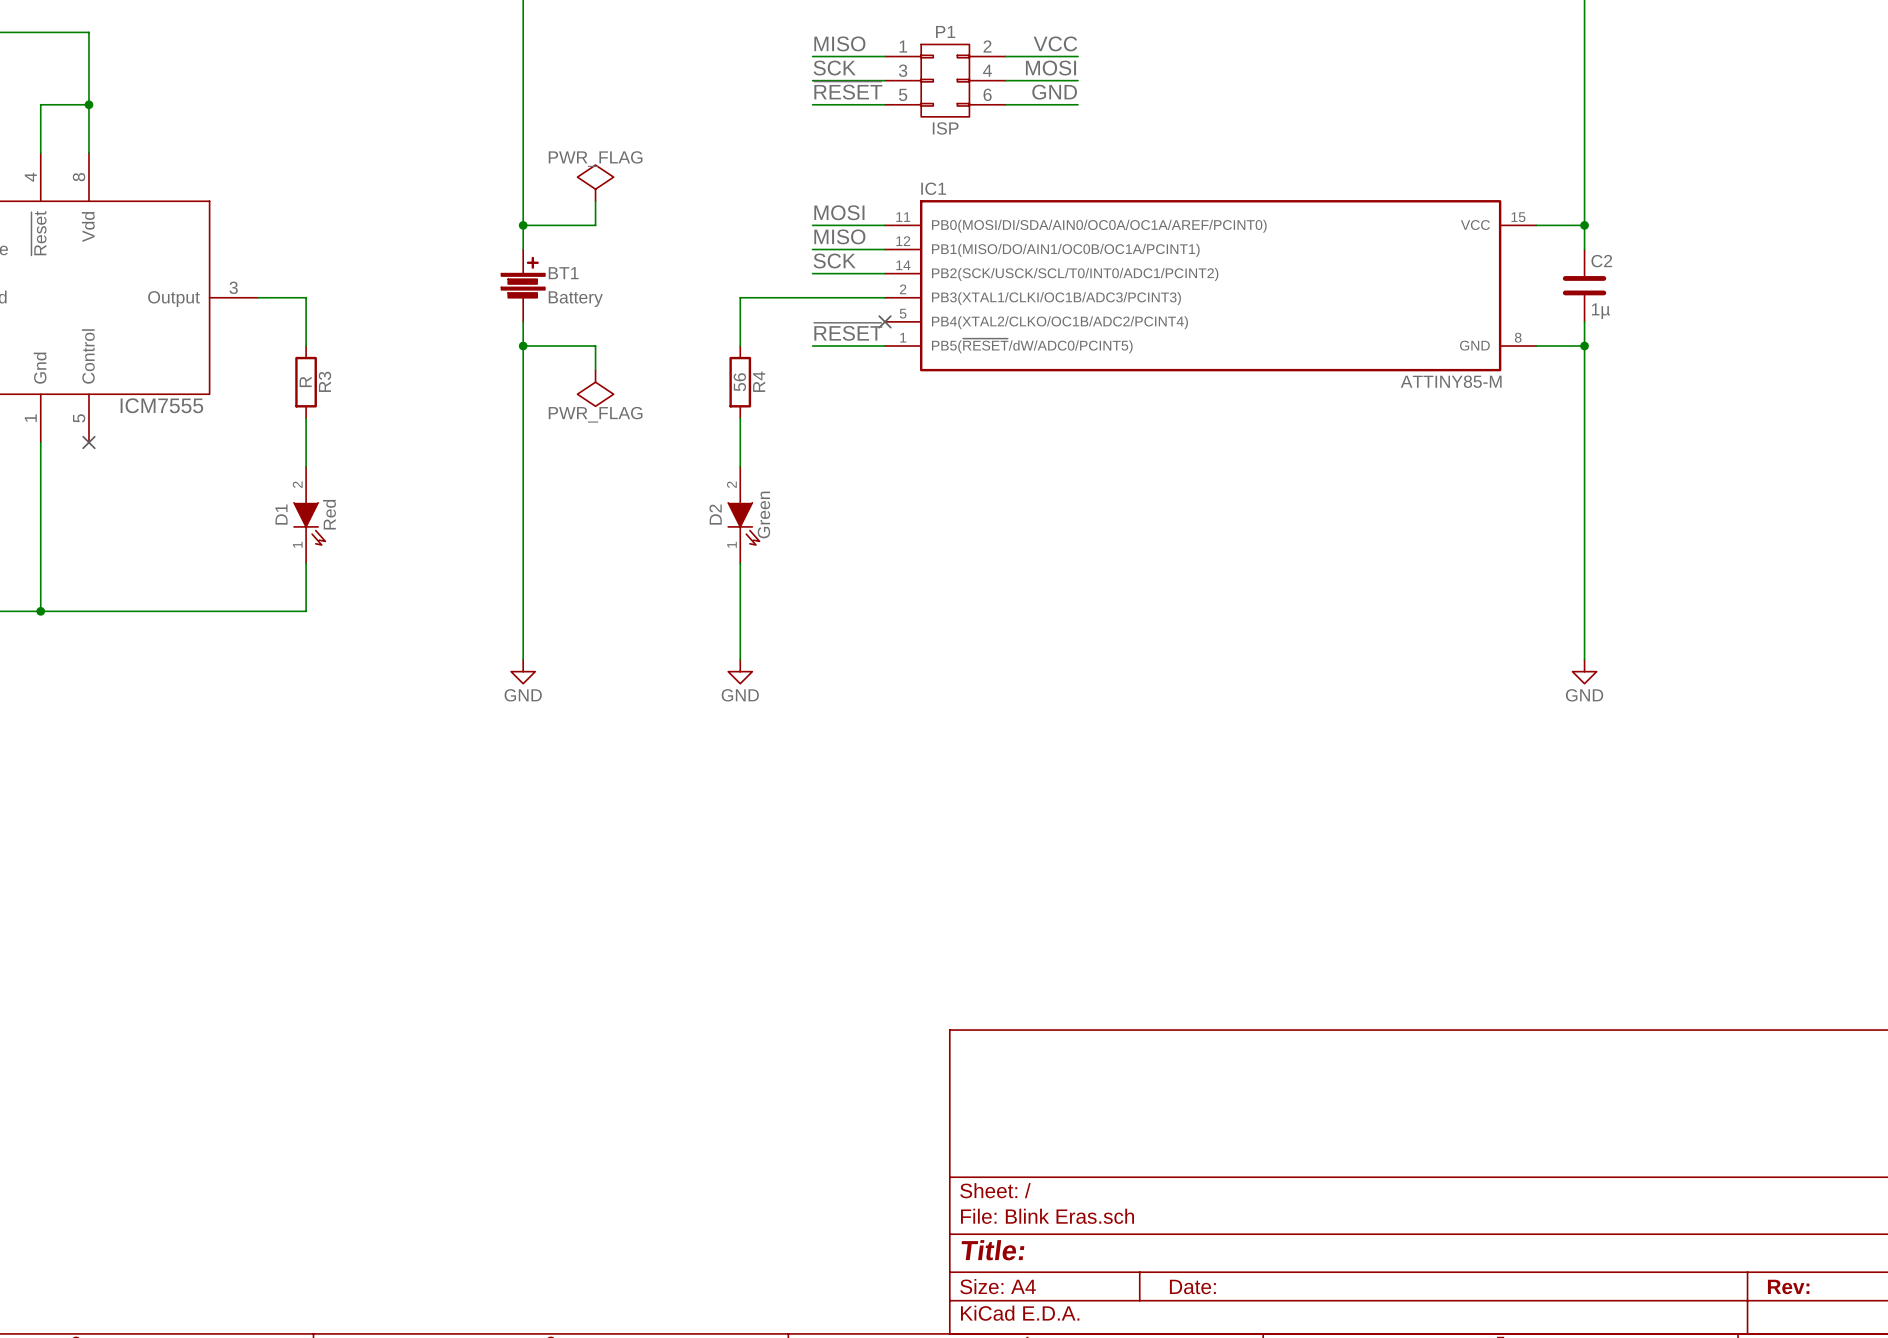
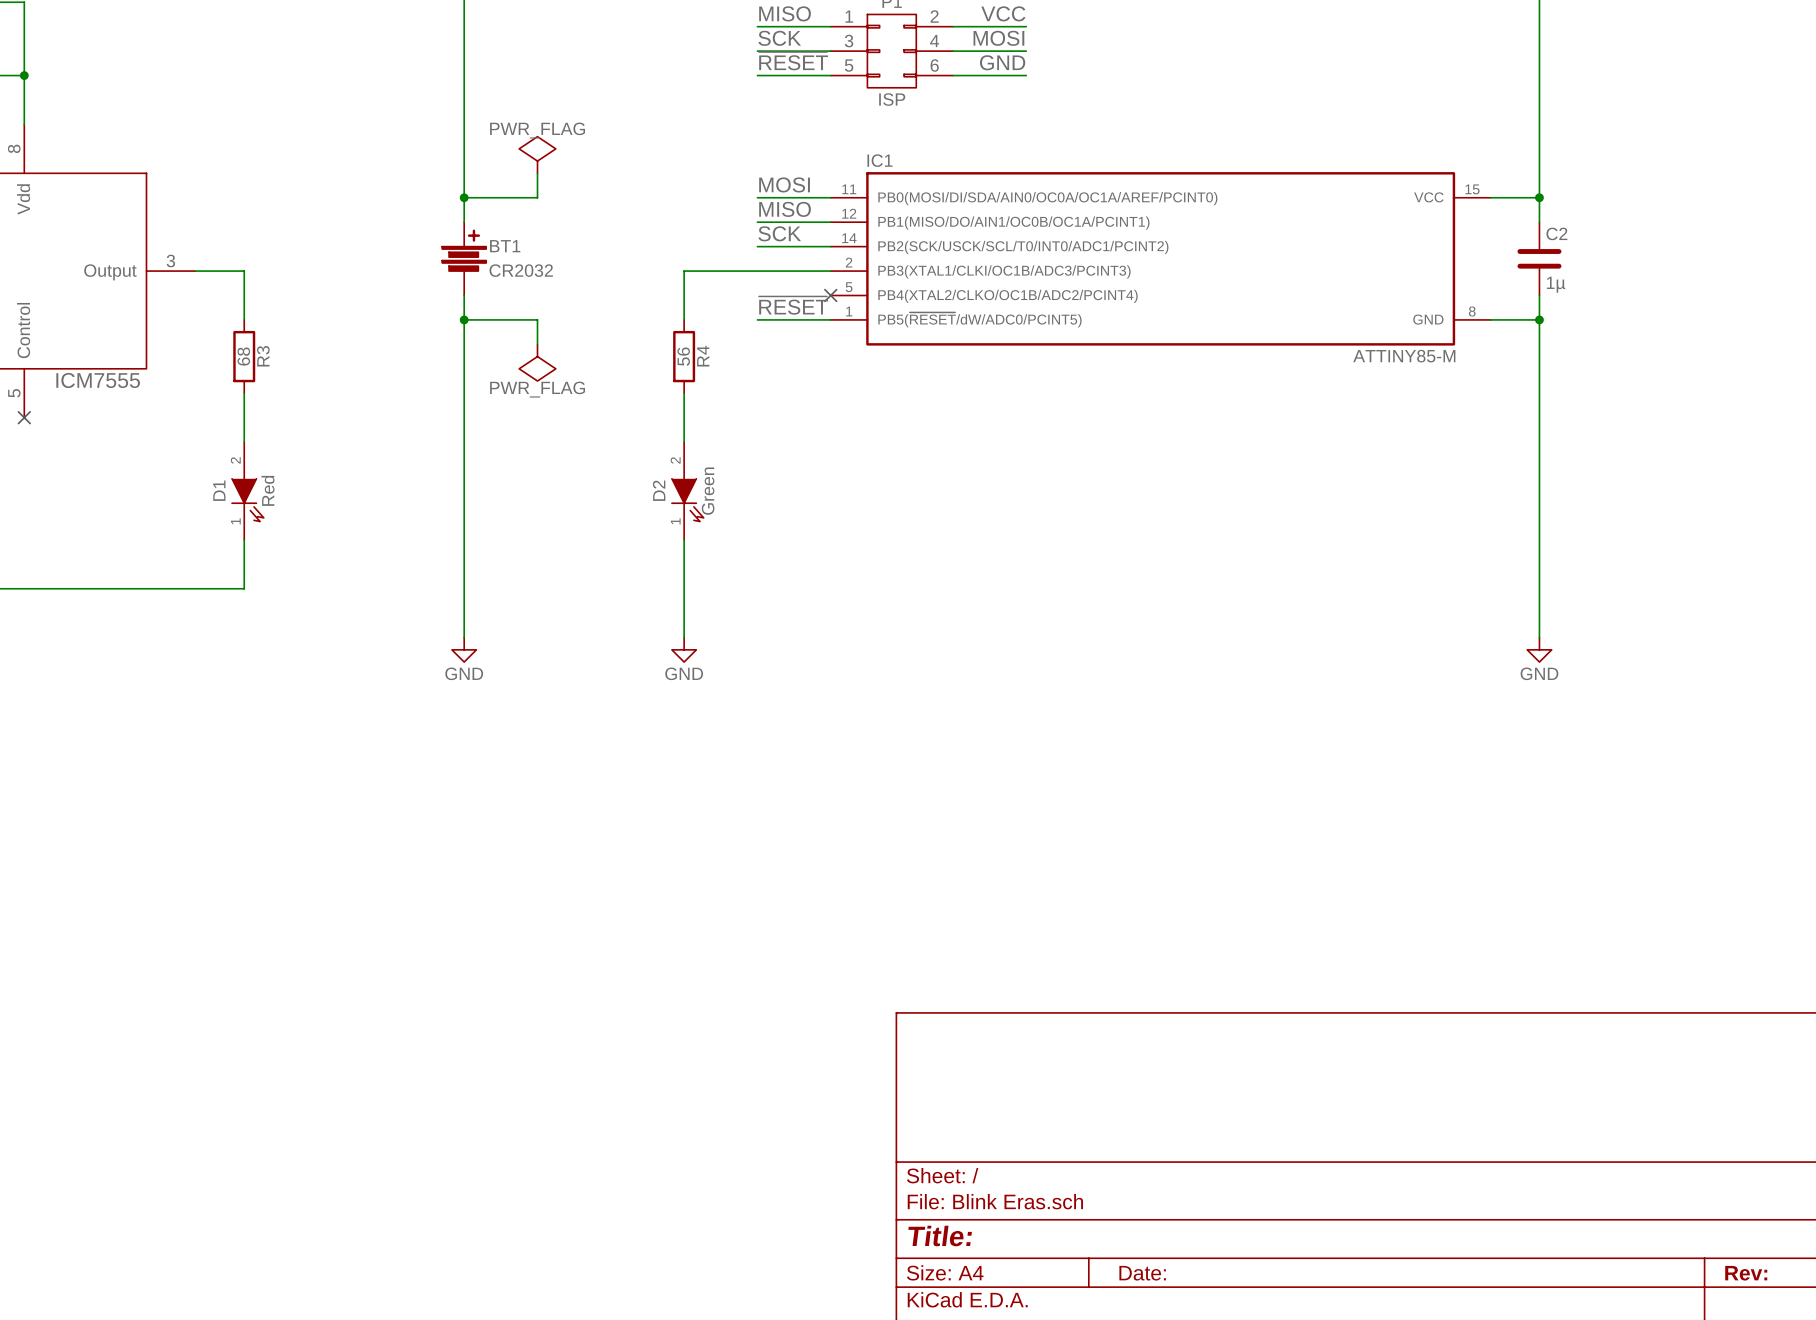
BT1 value: Battery (575, 299) -> CR2032 (521, 270)
R3 value: R (305, 381) -> 68 (243, 356)

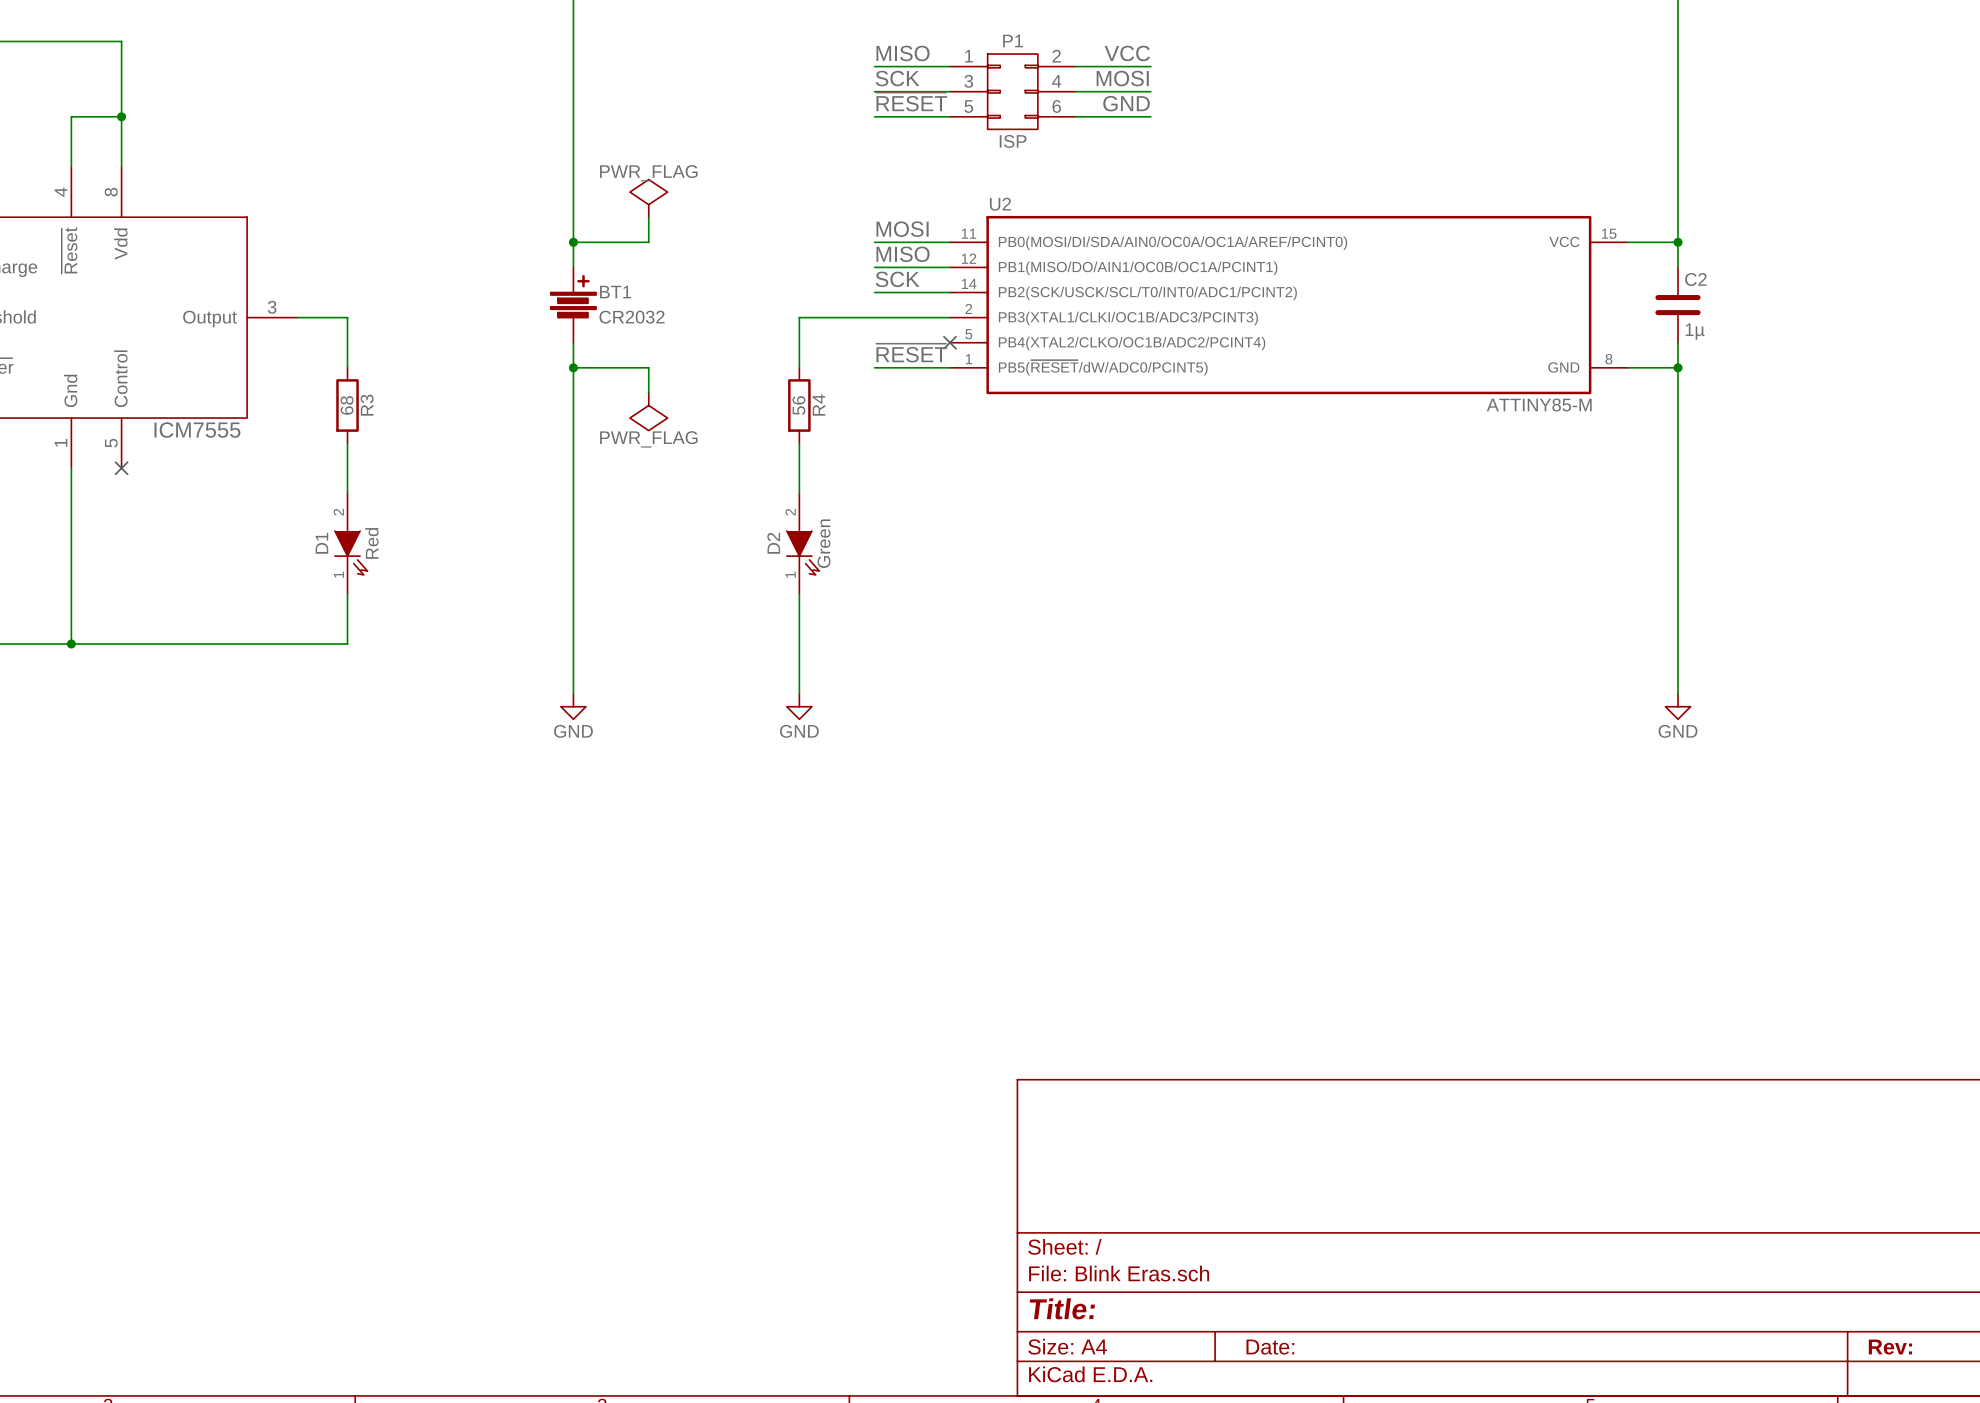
IC1 name: IC1 (880, 160) -> U2 (1000, 204)

